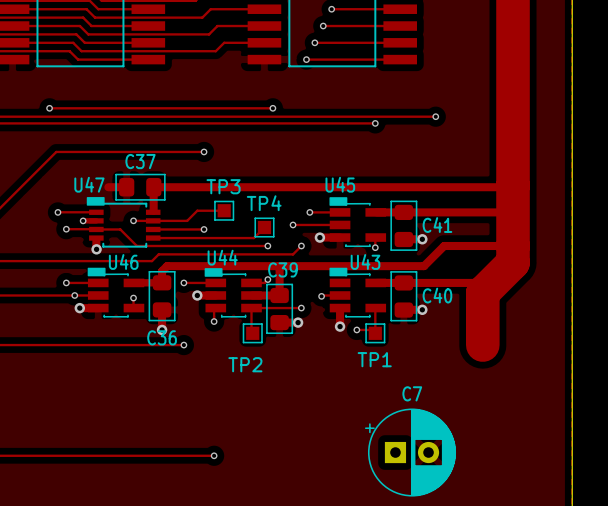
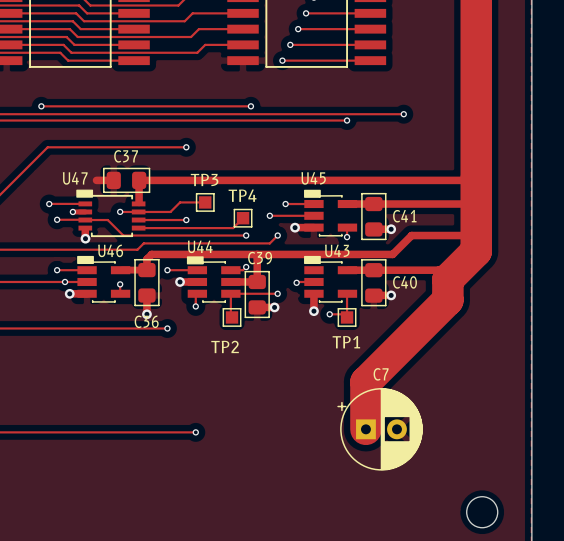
track: (482, 314) (482, 345) -> (447, 300) (365, 382) (365, 429)

